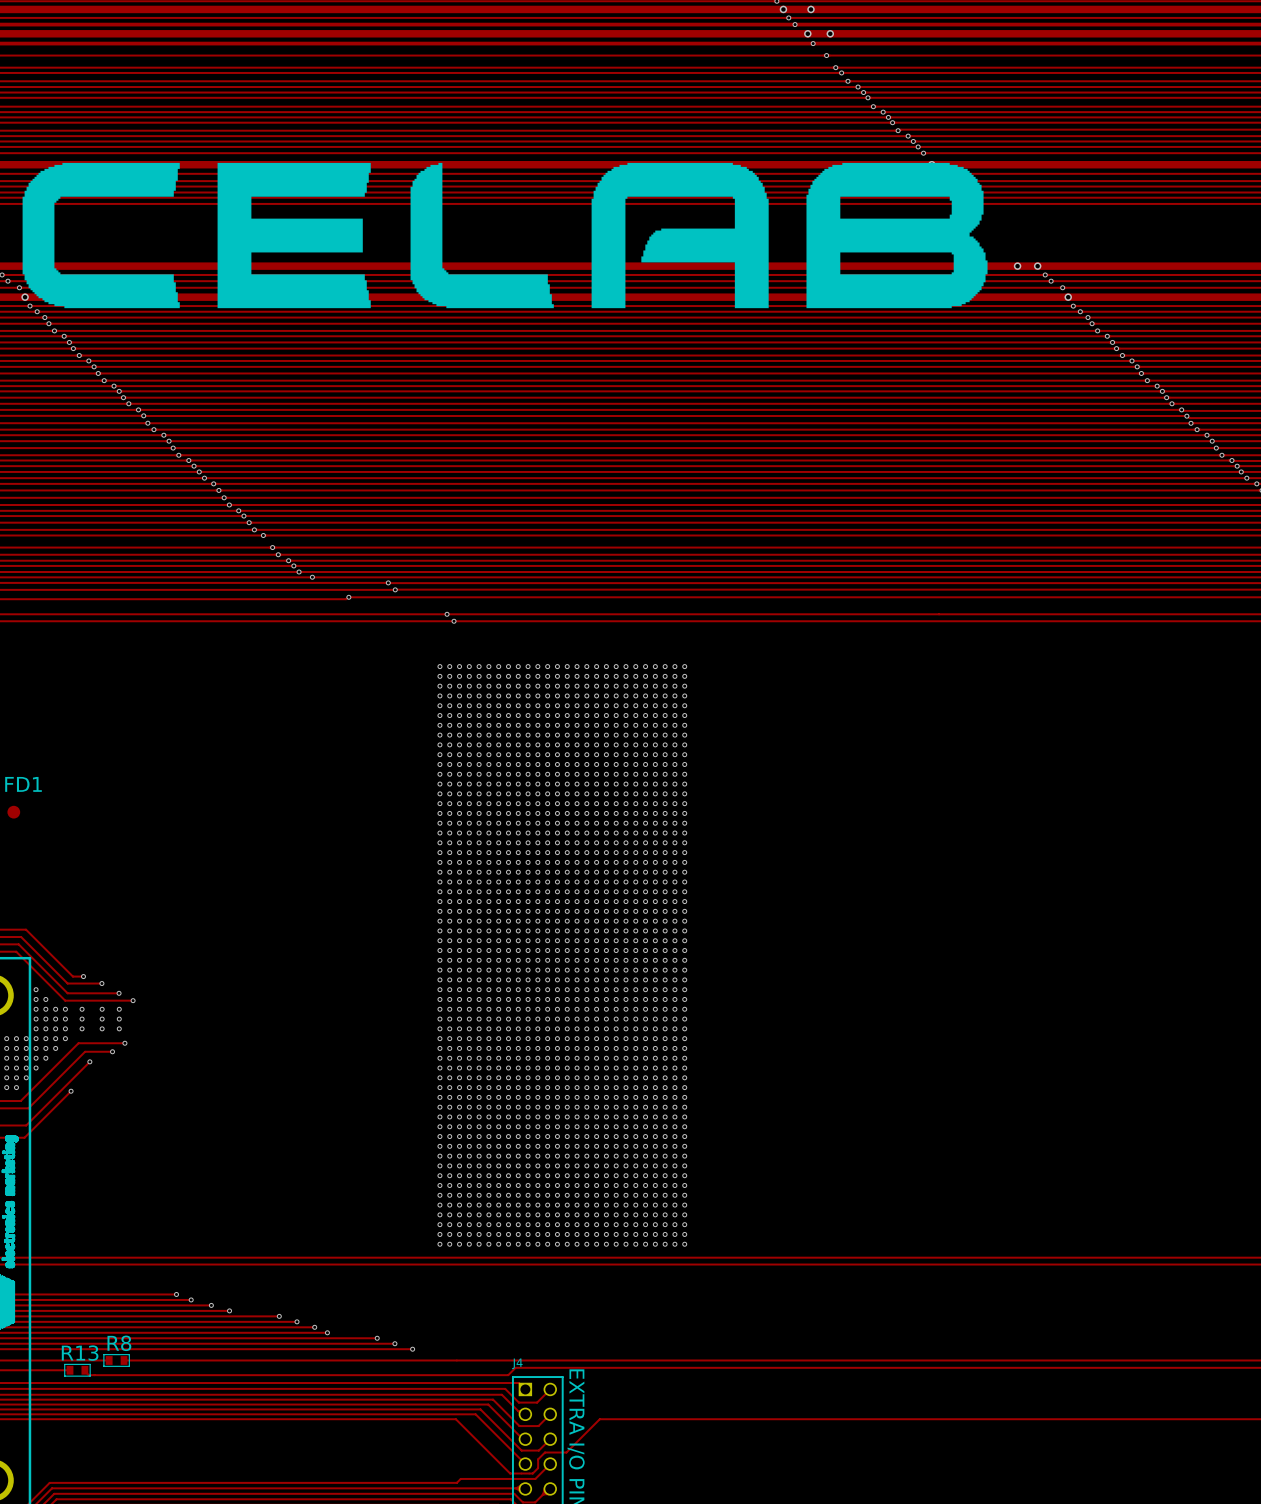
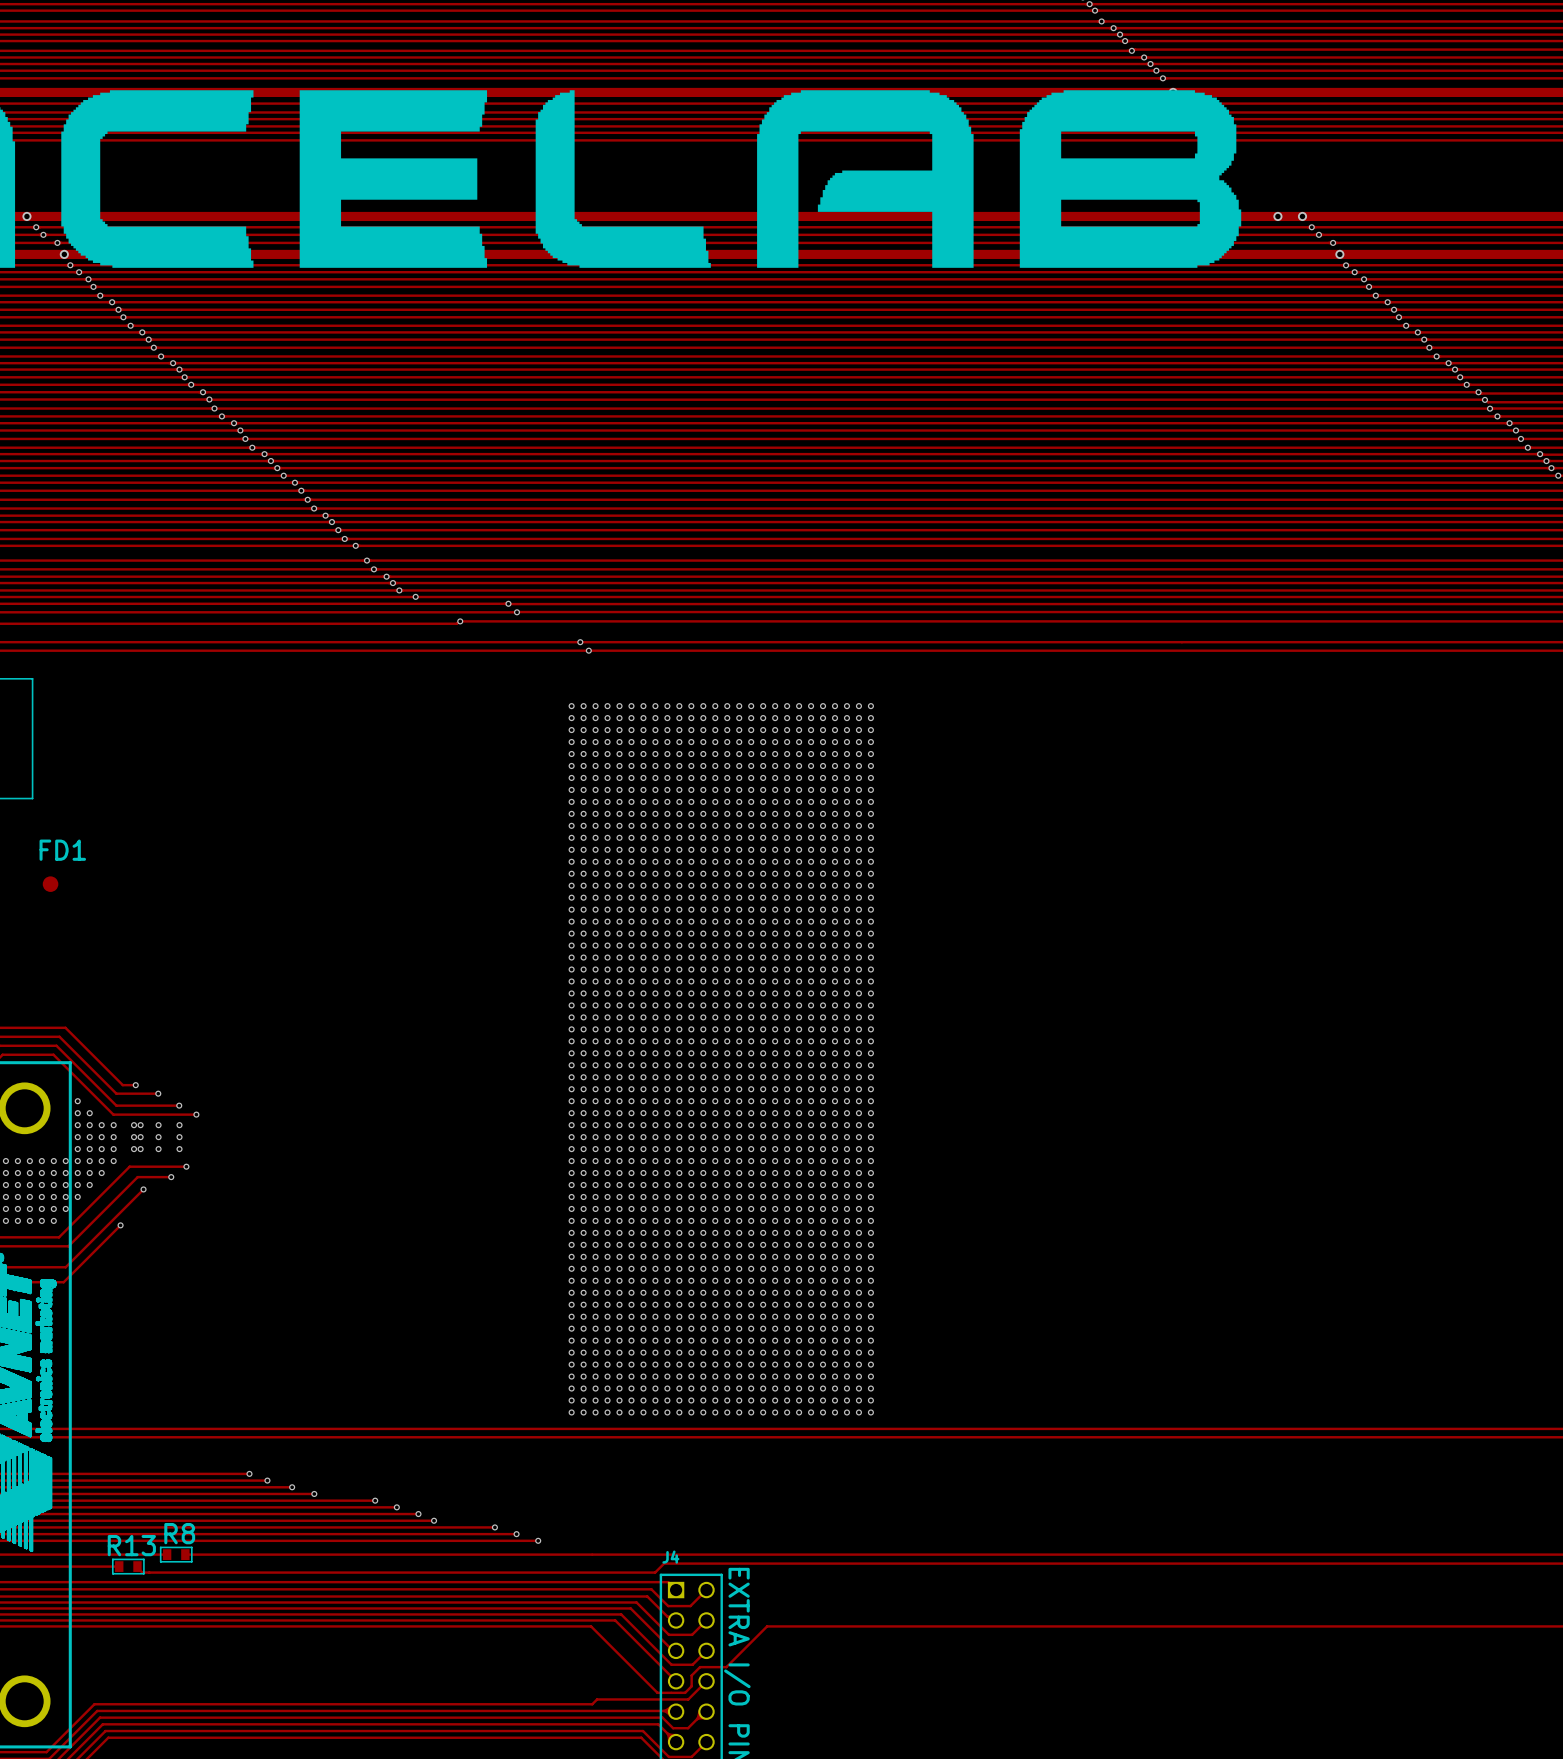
via: none -> (140, 1125)
via: none -> (140, 1137)
via: none -> (140, 1149)

